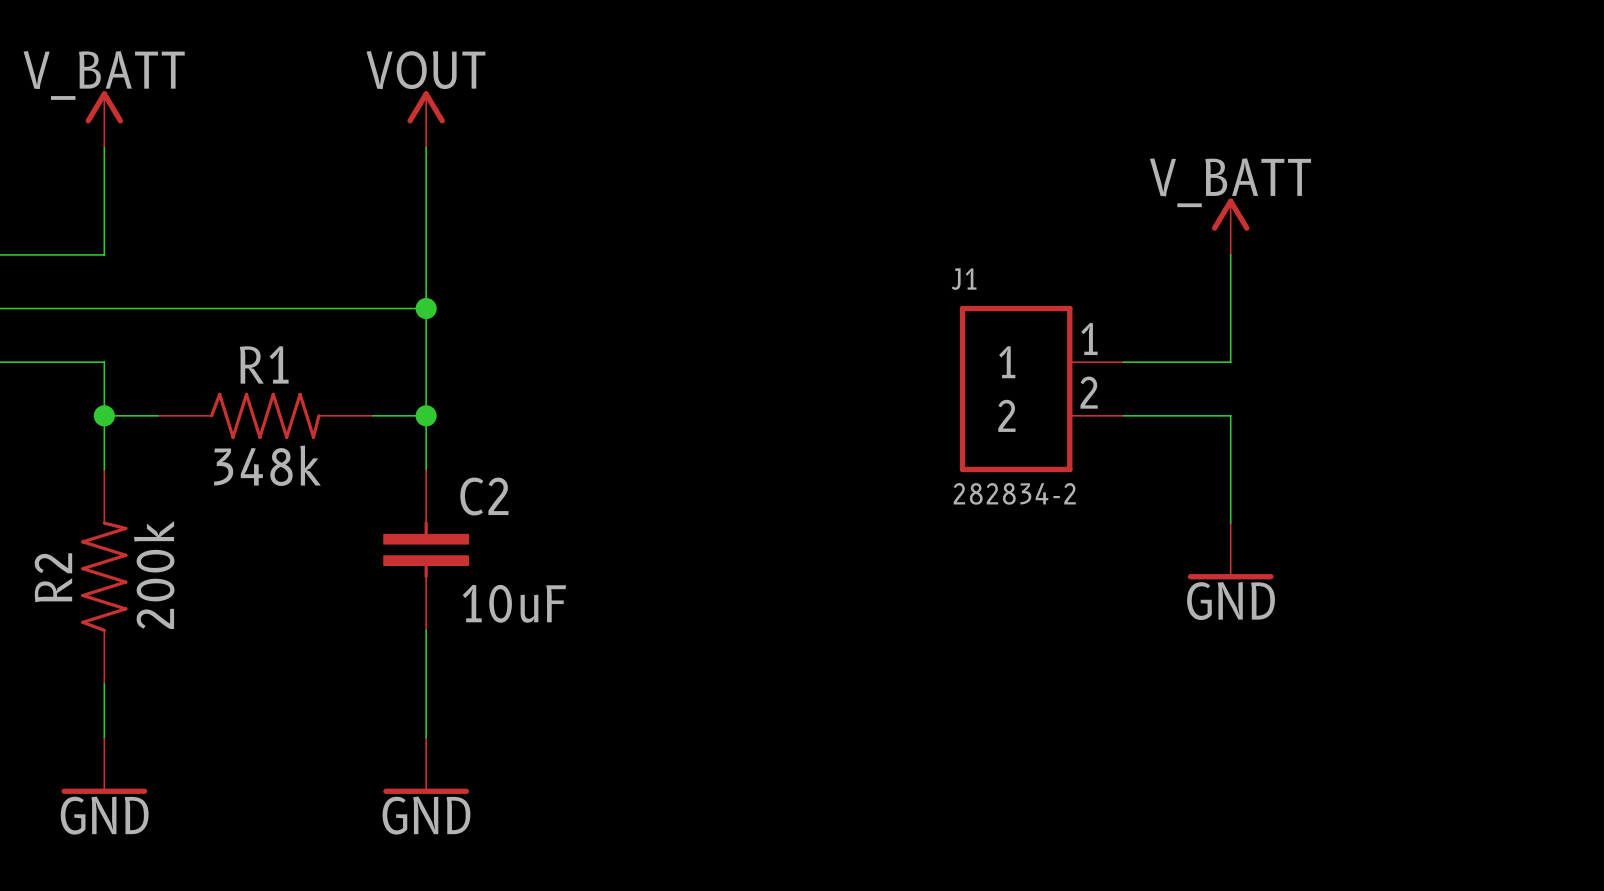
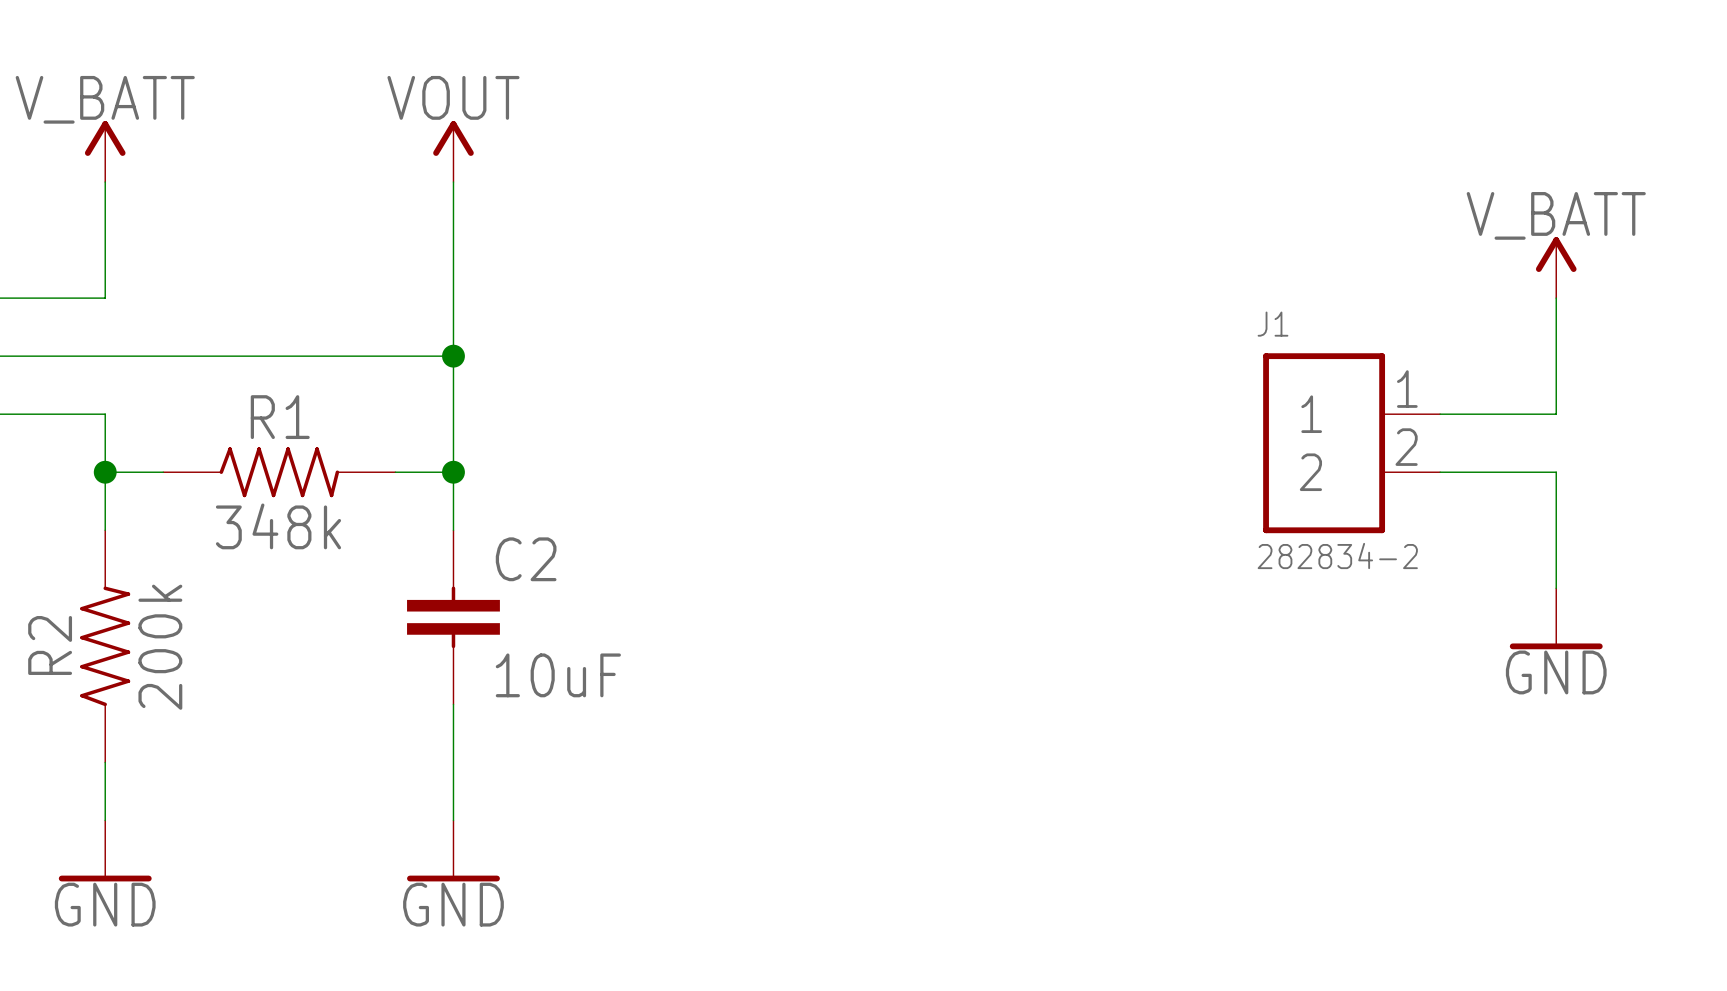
power symbol position: V_BATT (1230, 226) -> V_BATT (1556, 267)
wire: (1230, 254) (1230, 362) (1123, 362) -> (1556, 298) (1556, 414) (1440, 414)
J1 position: (1041, 389) -> (1351, 443)
wire: (1123, 415) (1230, 415) (1230, 523) -> (1440, 472) (1556, 472) (1556, 588)
power symbol position: GND (1230, 551) -> GND (1556, 618)

